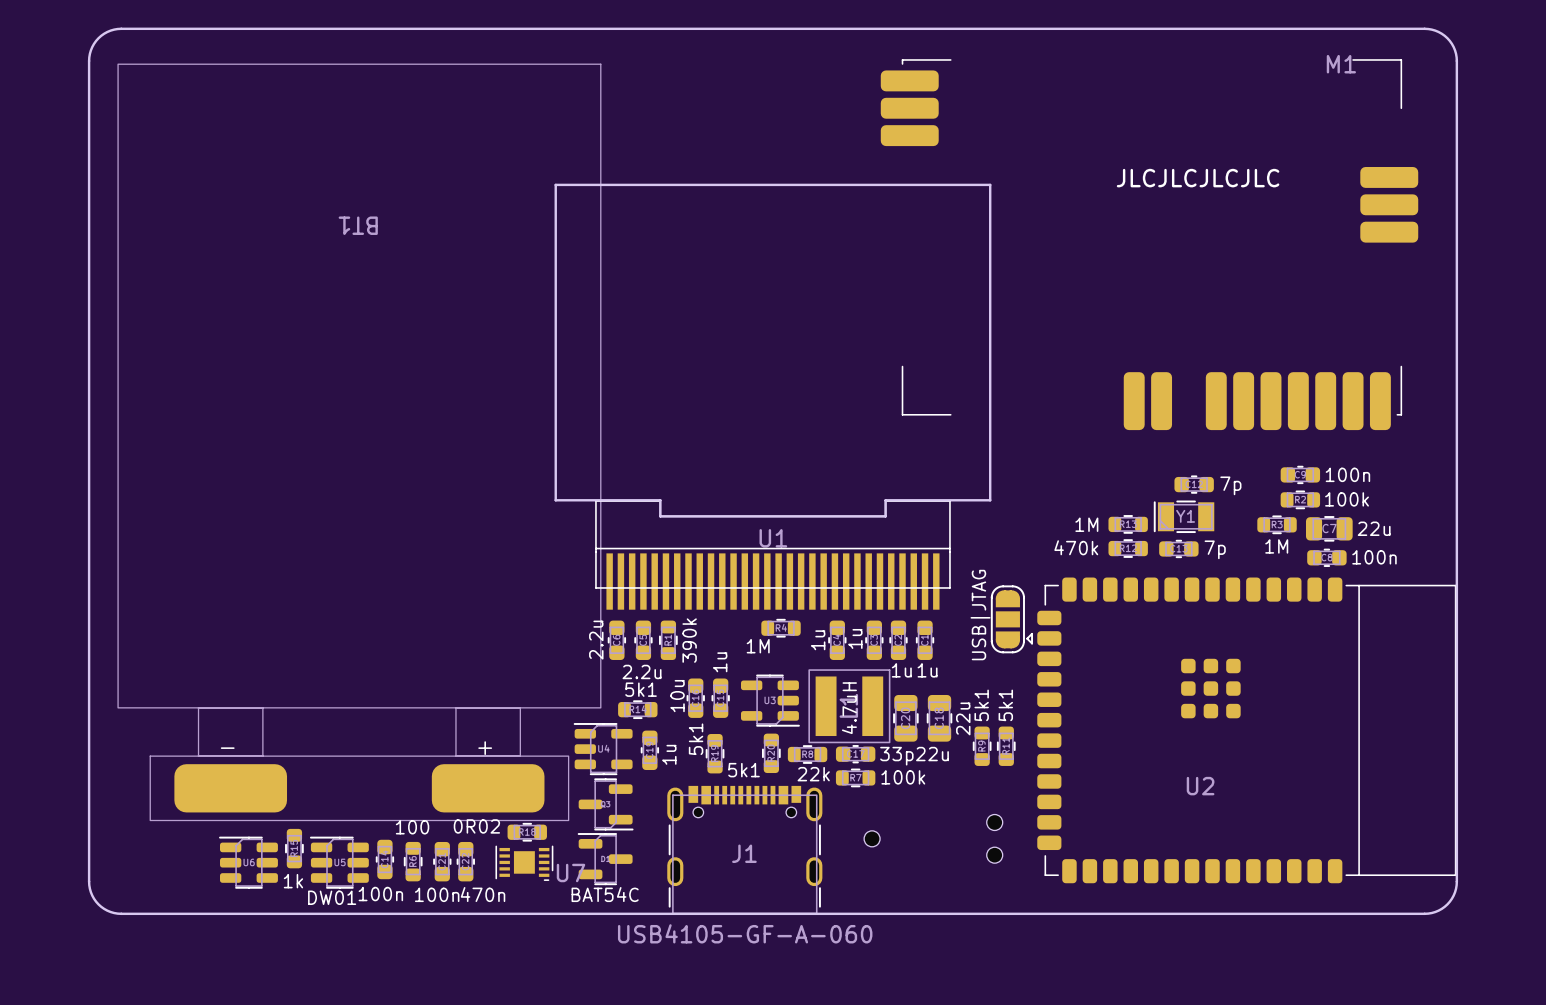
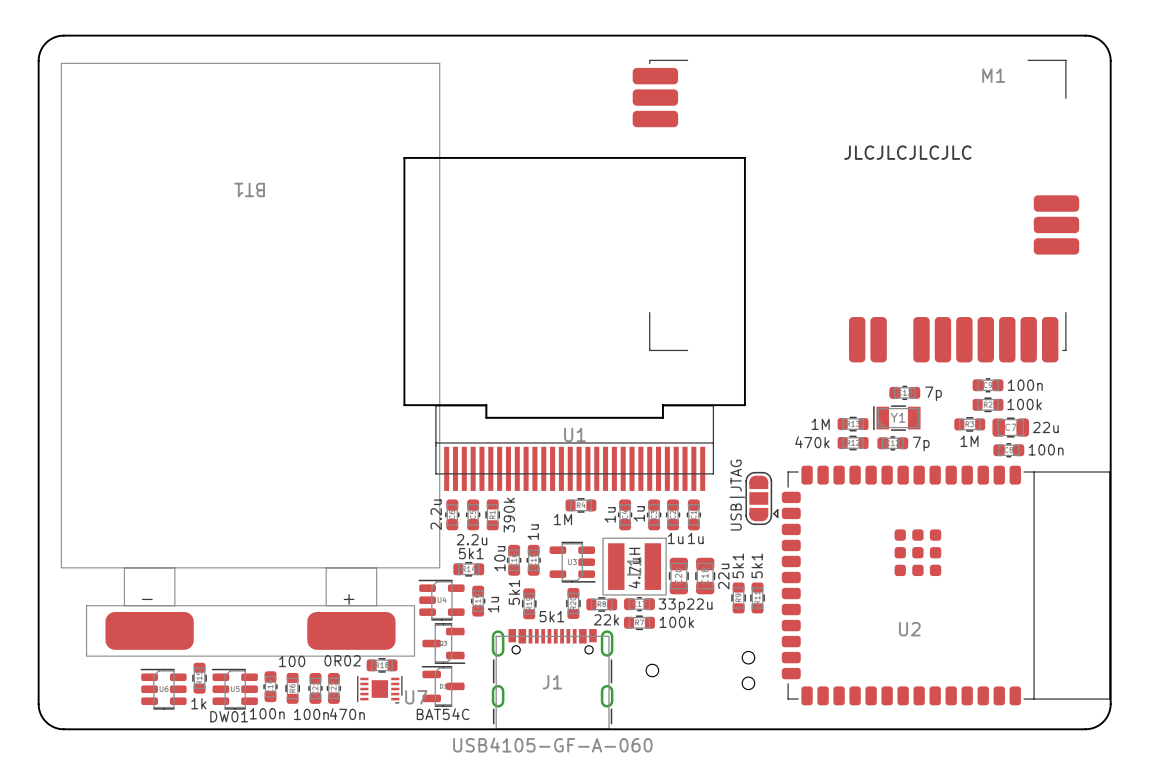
M1 footprint: [880, 59, 1419, 431] -> [632, 59, 1080, 363]

